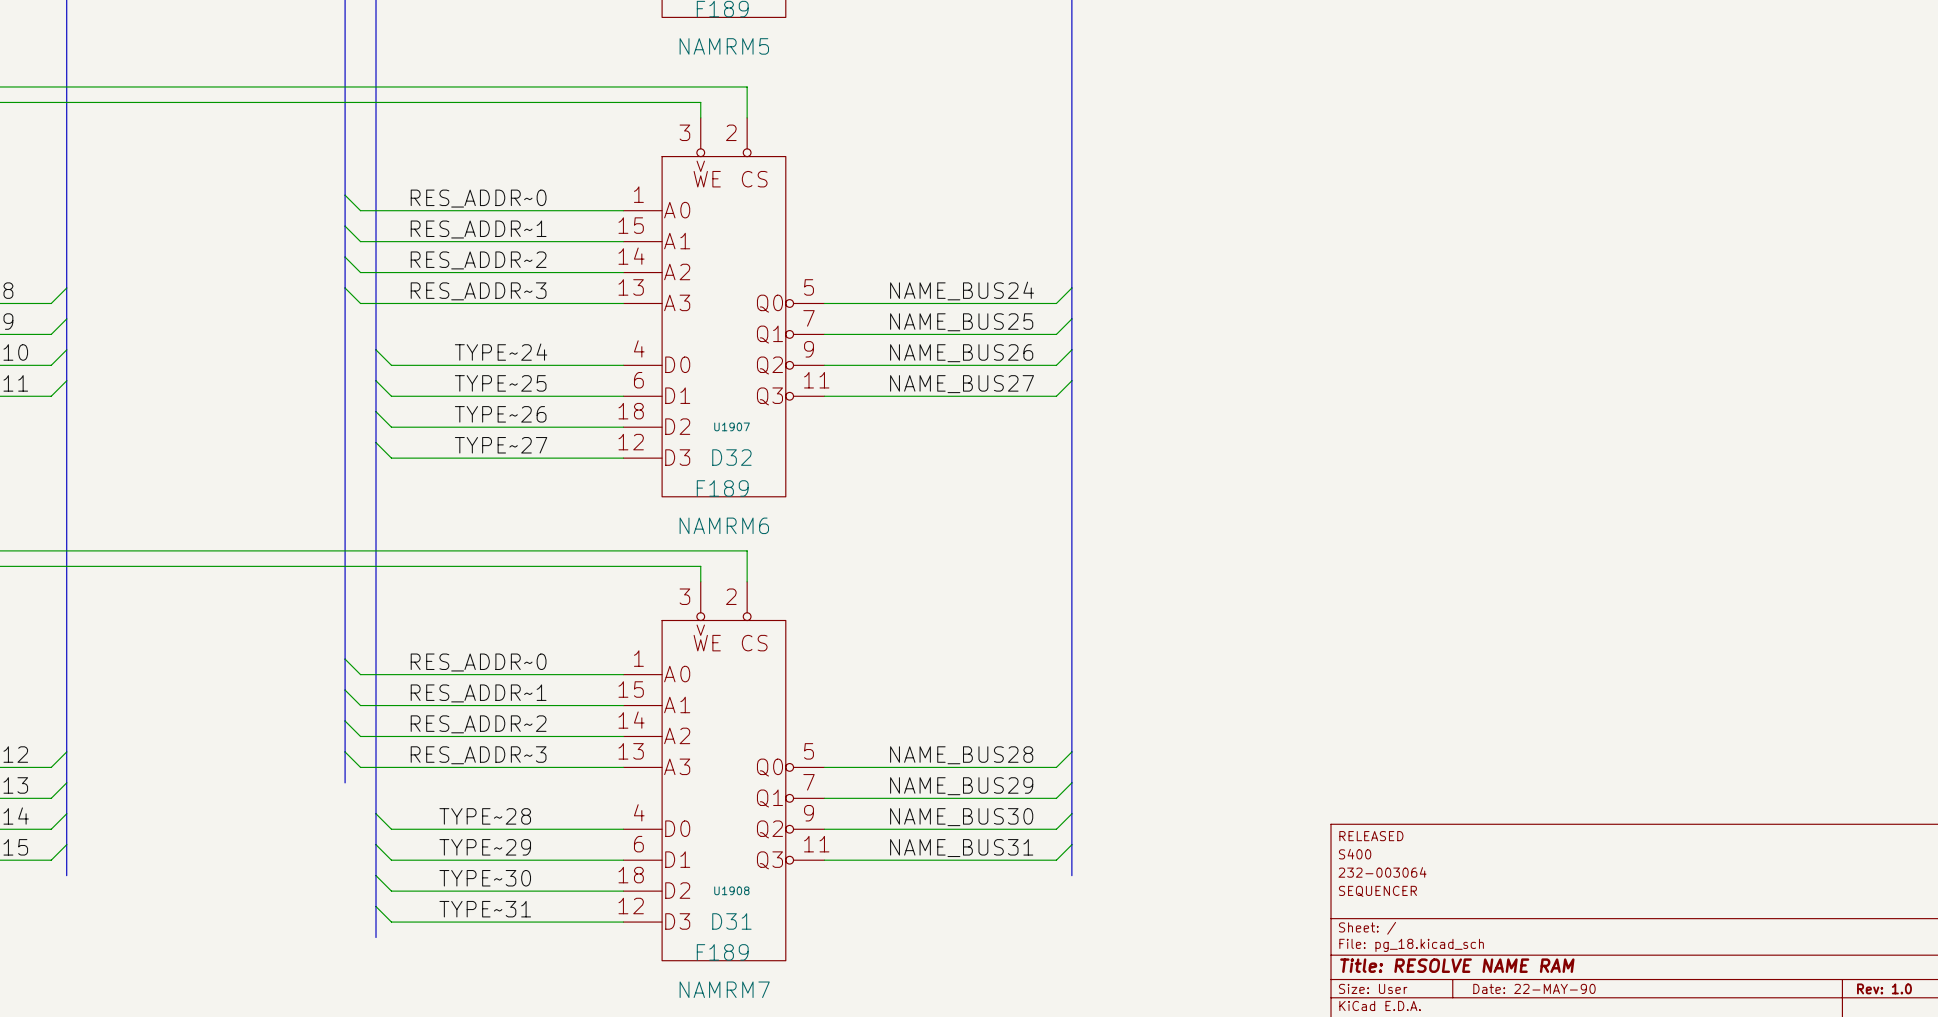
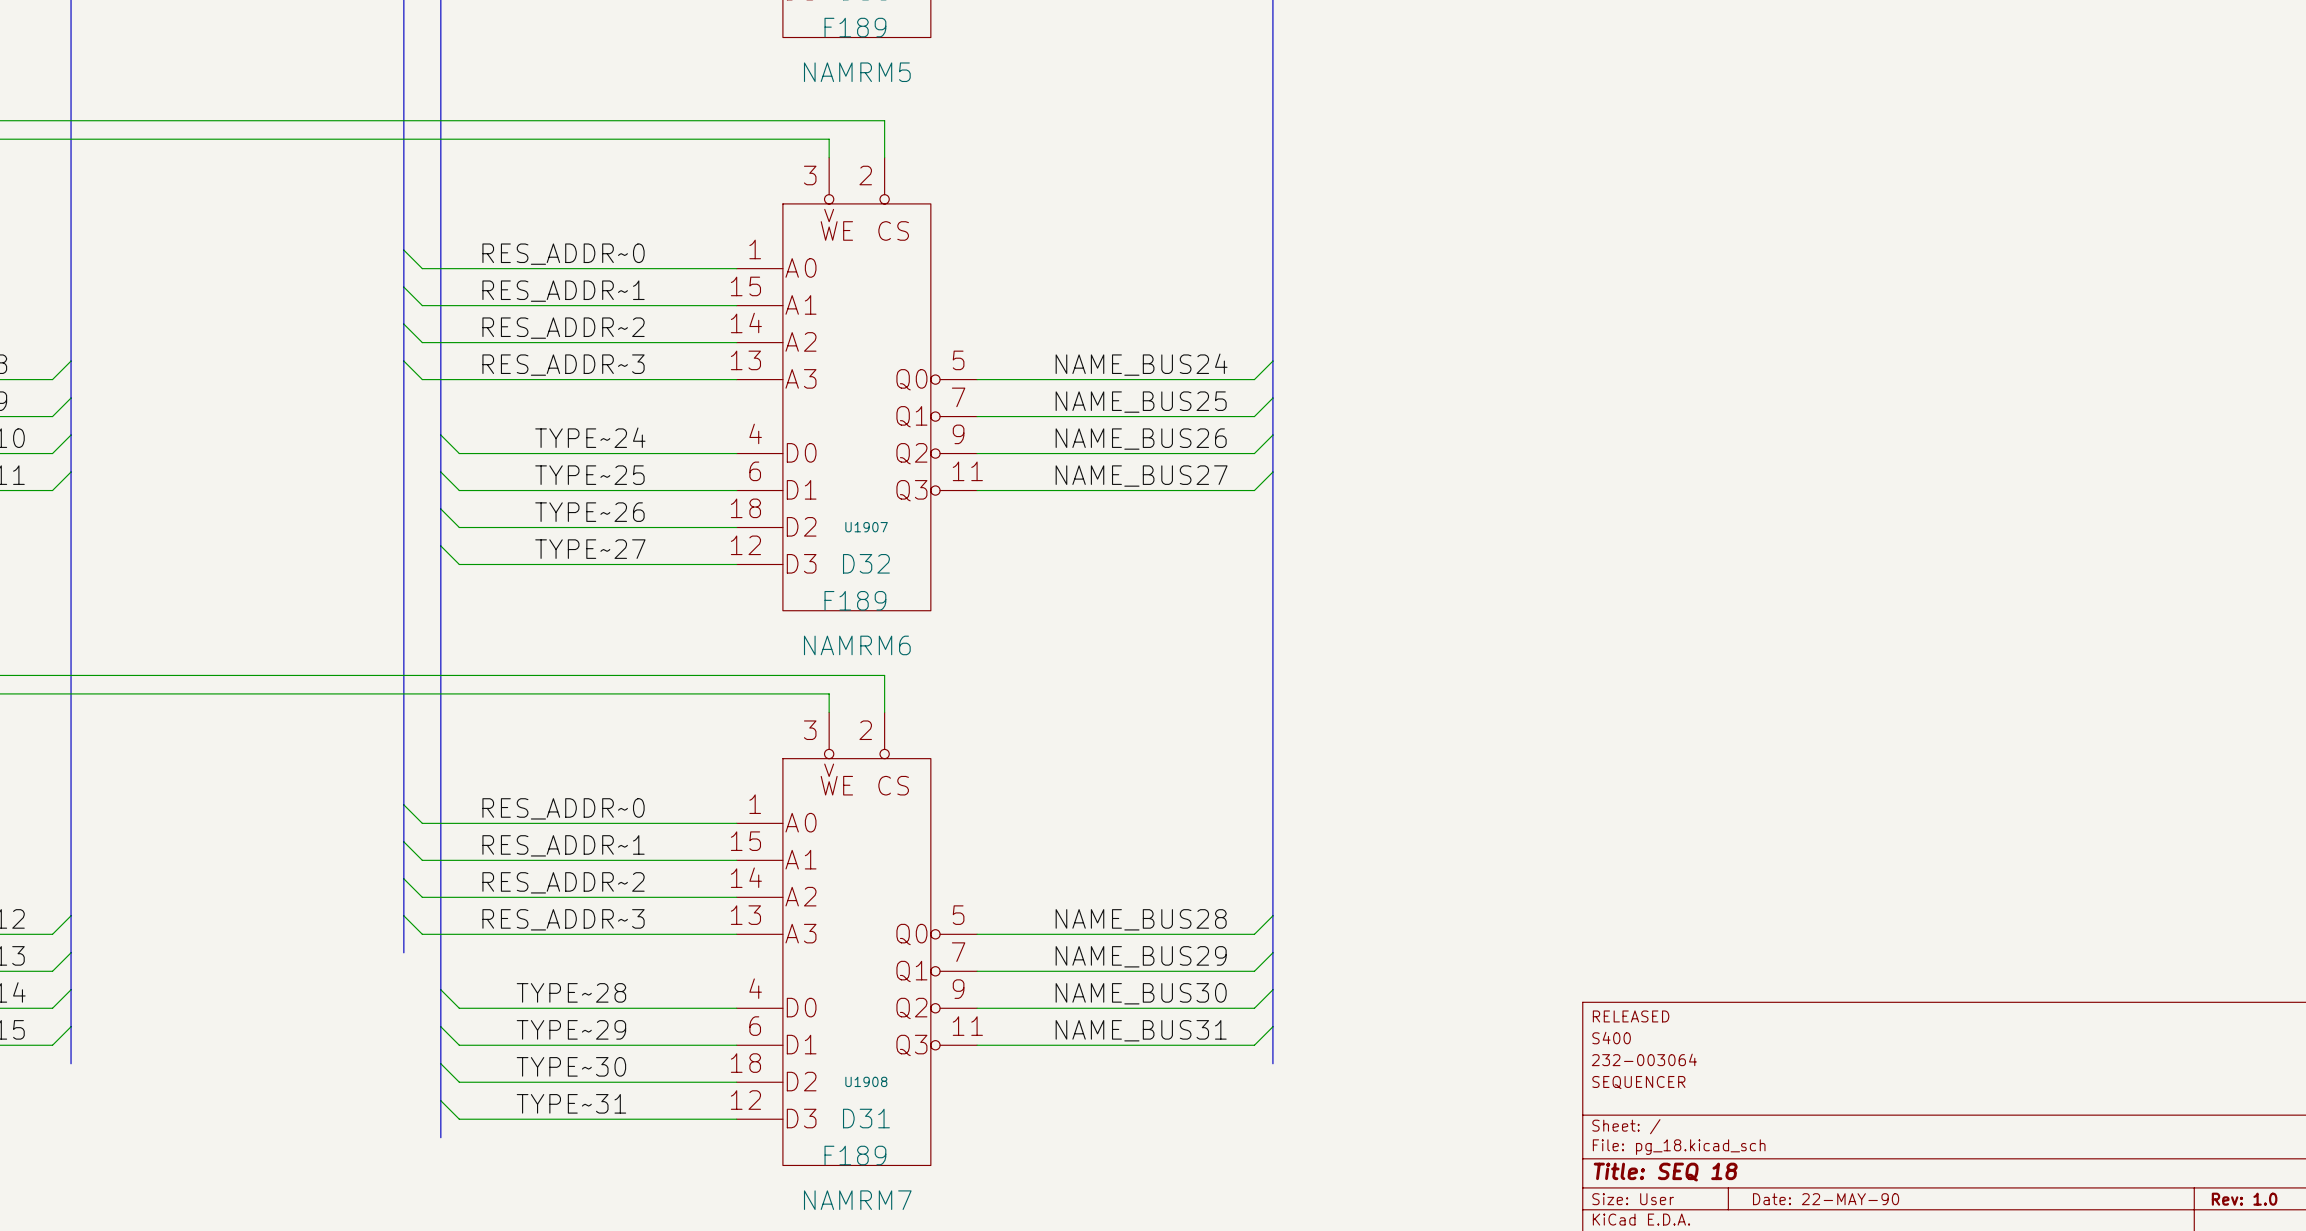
title block: Title: RESOLVE NAME RAM (1457, 965) -> Title: SEQ 18 (1665, 1172)

